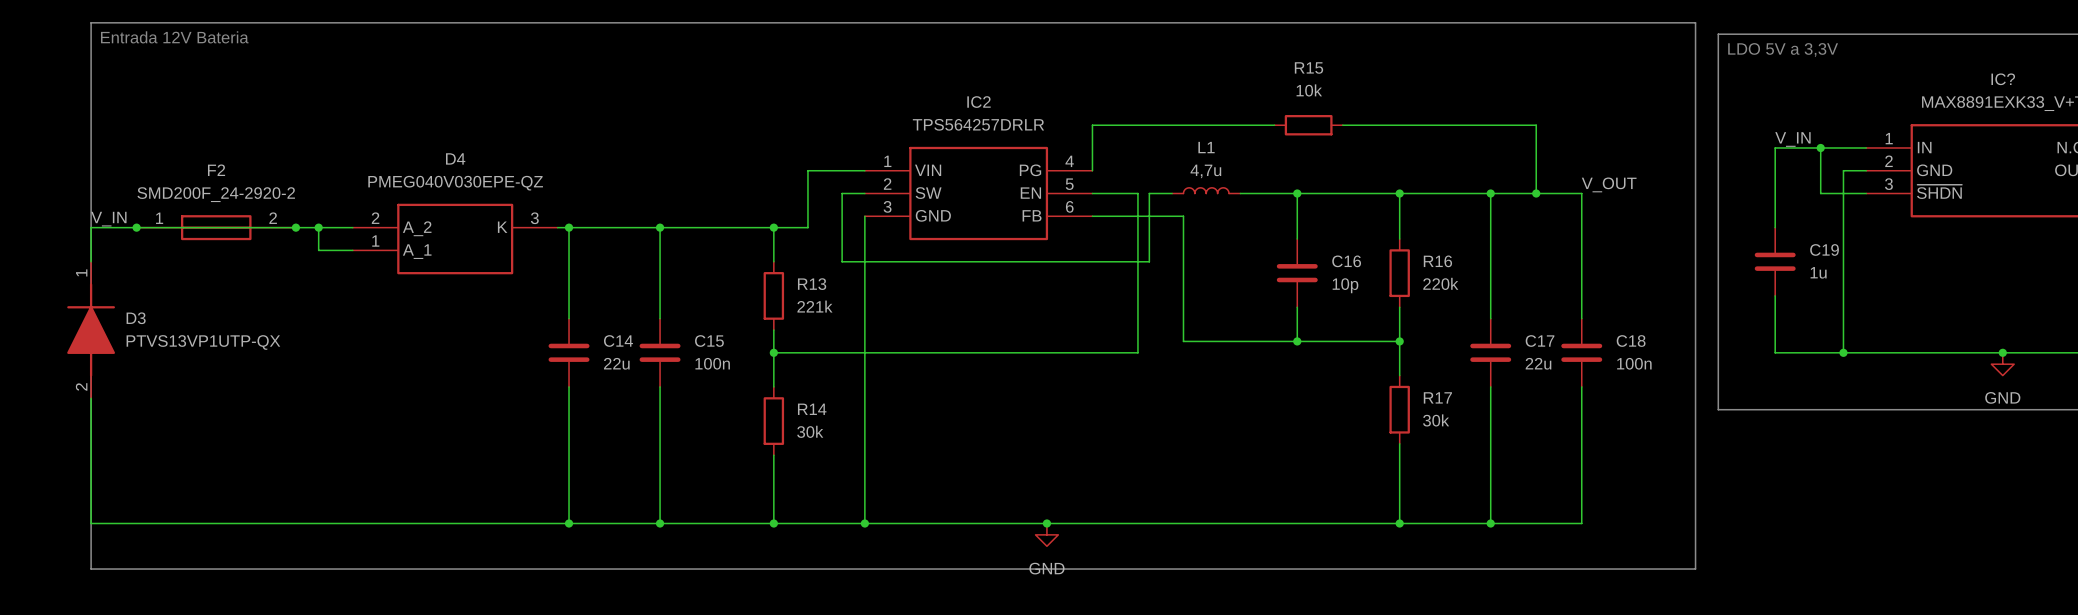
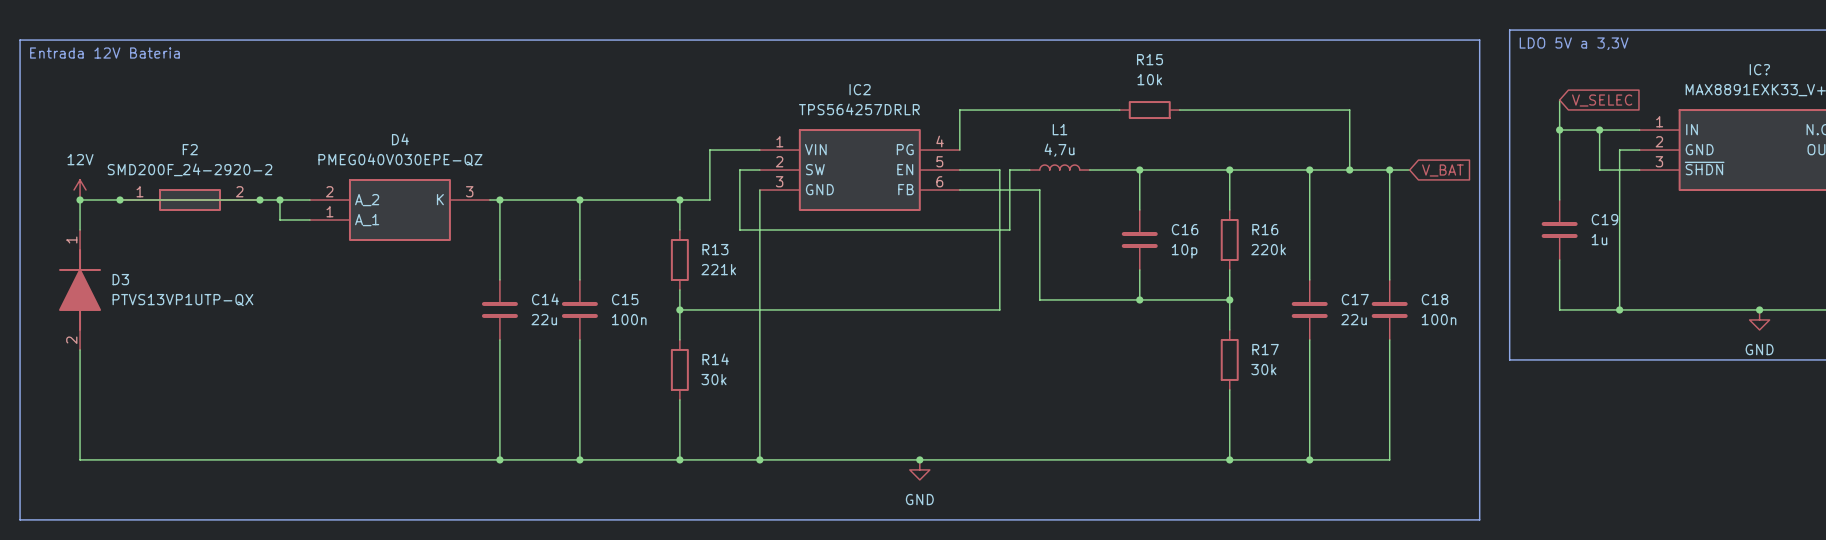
line: (91, 22) (1695, 22) (1695, 569) (91, 569) (91, 22) -> (20, 40) (20, 519) (1479, 519) (1479, 40) (20, 40)
text position: Entrada 12V Bateria (174, 37) -> Entrada 12V Bateria (104, 53)
wire: none -> (1559, 100) (1559, 130)
global label: none -> V_SELEC (1602, 100)
label: V_IN (1792, 139) -> none
junction: none -> (1559, 130)
label: V_OUT (1609, 184) -> none
wire: none -> (1389, 170) (1409, 170)
junction: none -> (1389, 170)
global label: none -> V_BAT (1442, 170)
power symbol: none -> 12V (80, 190)
label: V_IN (108, 219) -> none
junction: none -> (80, 200)

